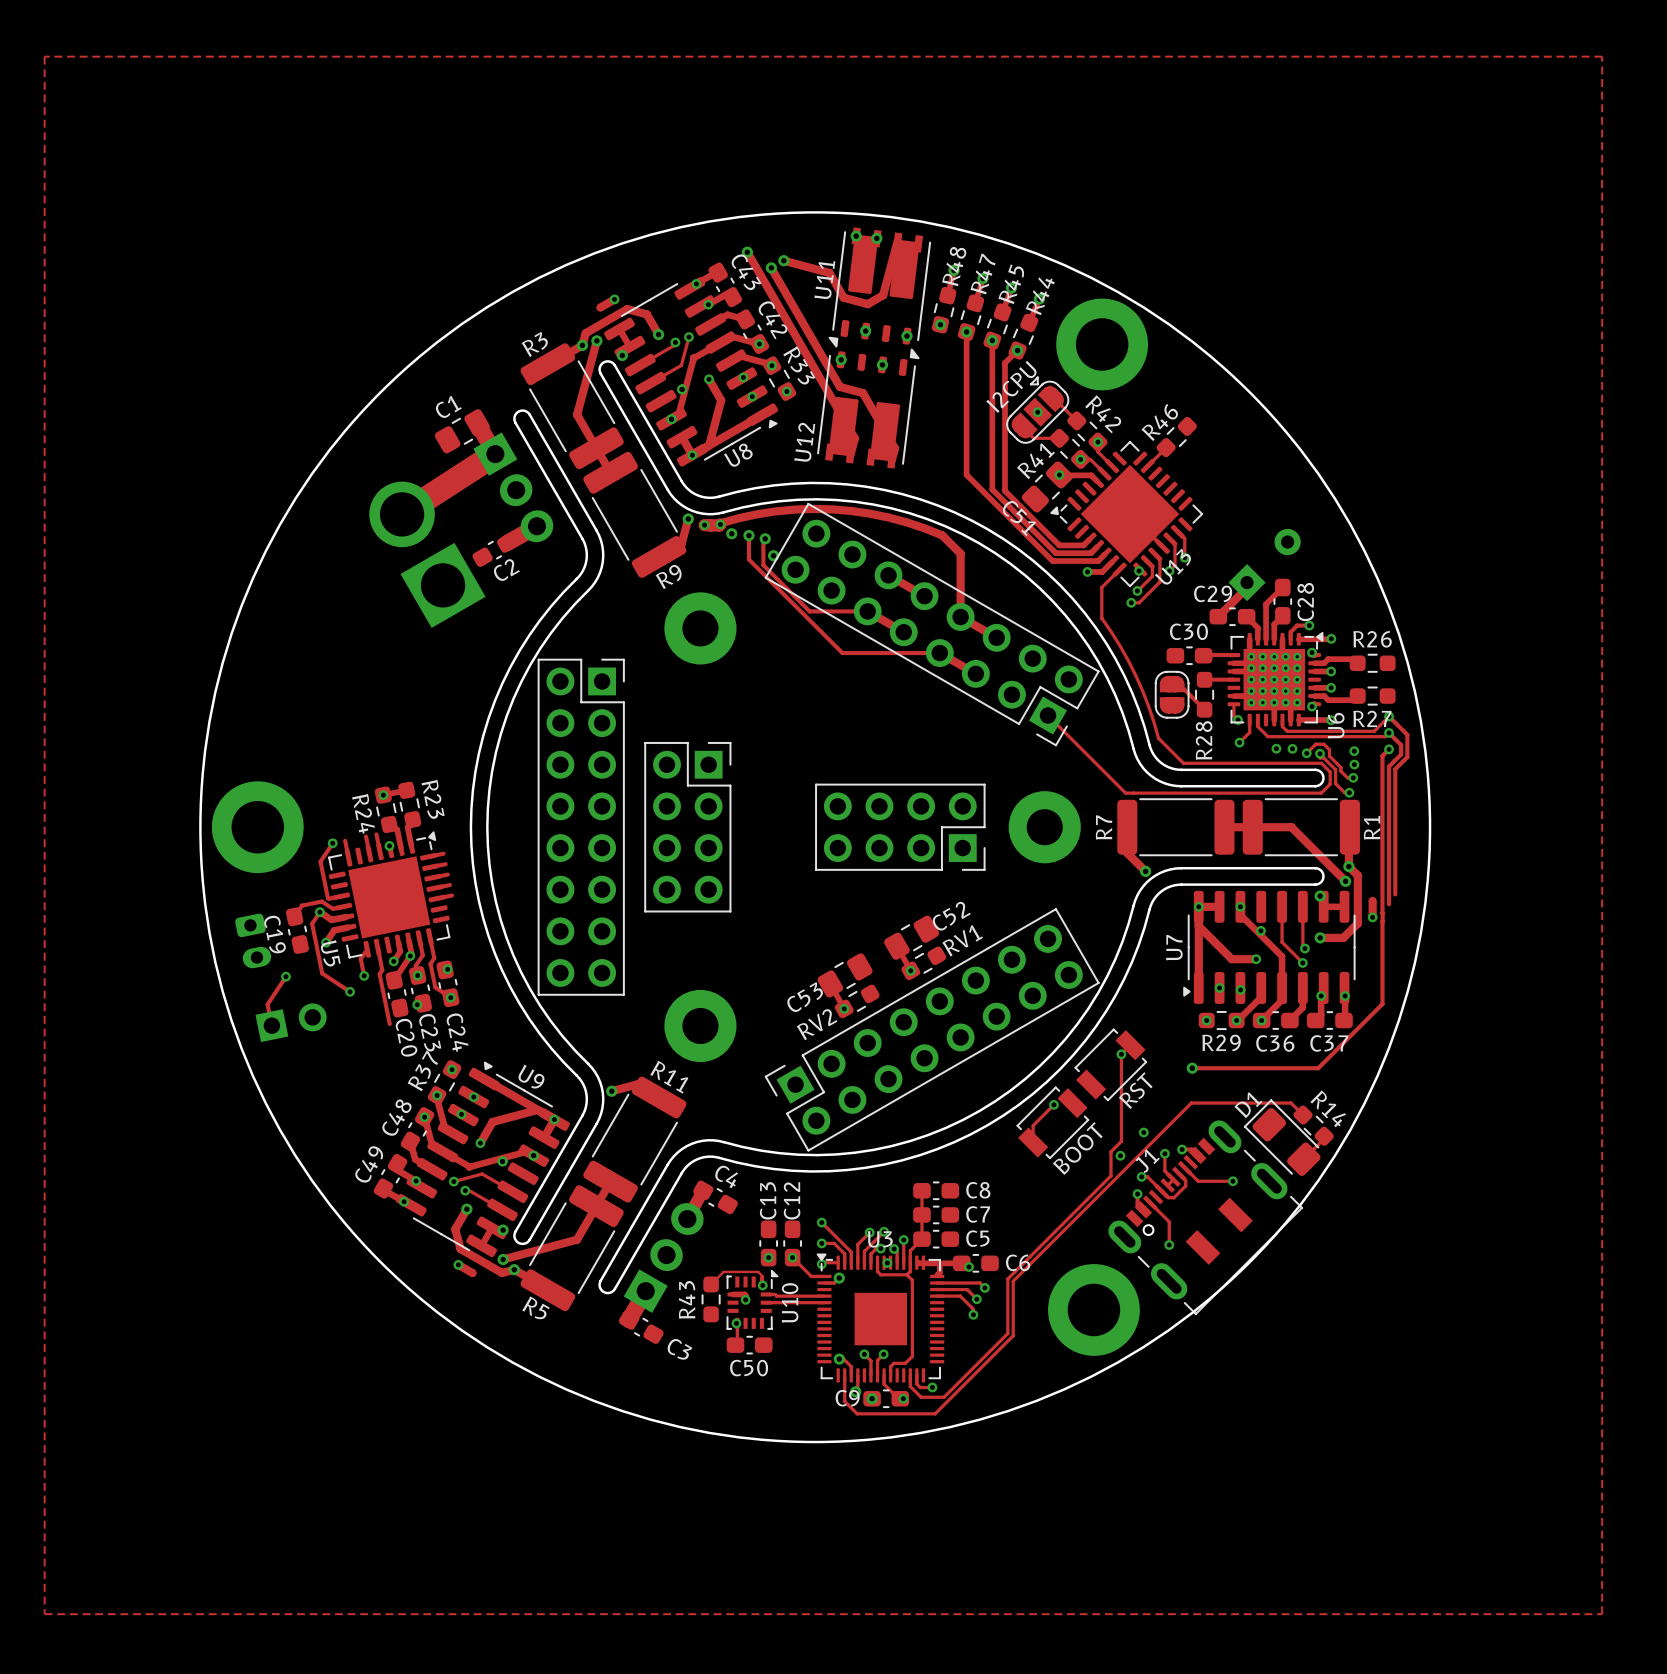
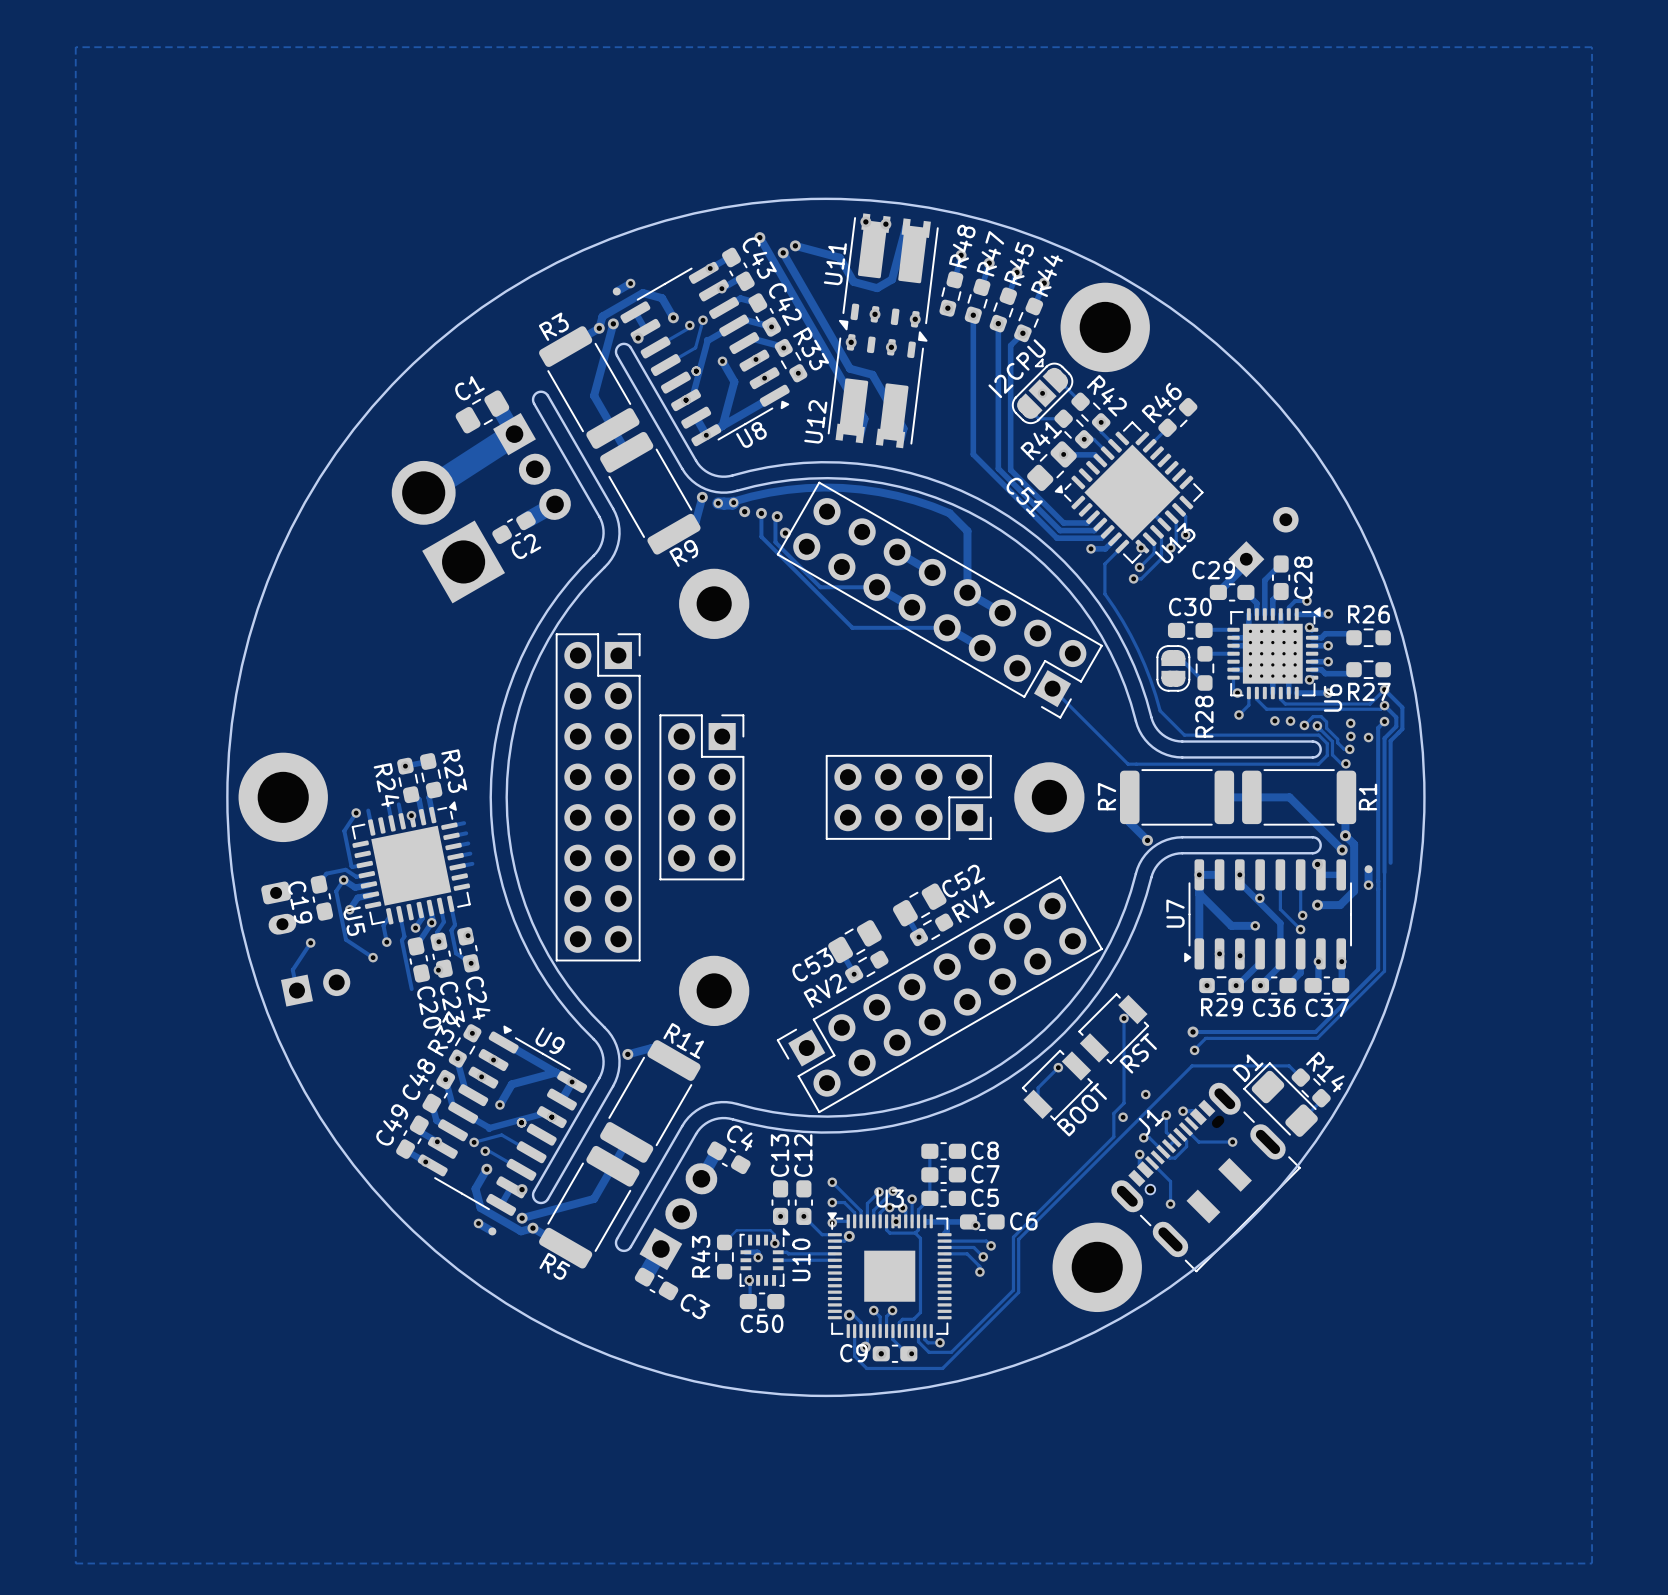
via: none -> (1368, 737)
track: none -> (1384, 872) (1384, 971) (1317, 1038) (1205, 1038) (1194, 1049)
via: none -> (1194, 1050)

